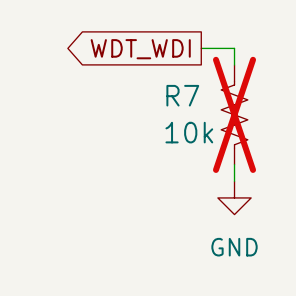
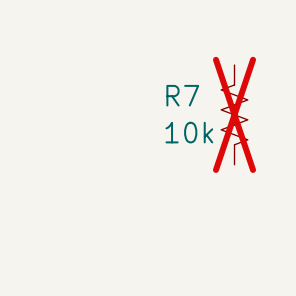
wire: (201, 48) (234, 48) (234, 65) -> none
global label: WDT_WDI (140, 49) -> none
wire: (234, 164) (234, 181) -> none
power symbol: GND (234, 197) -> none

